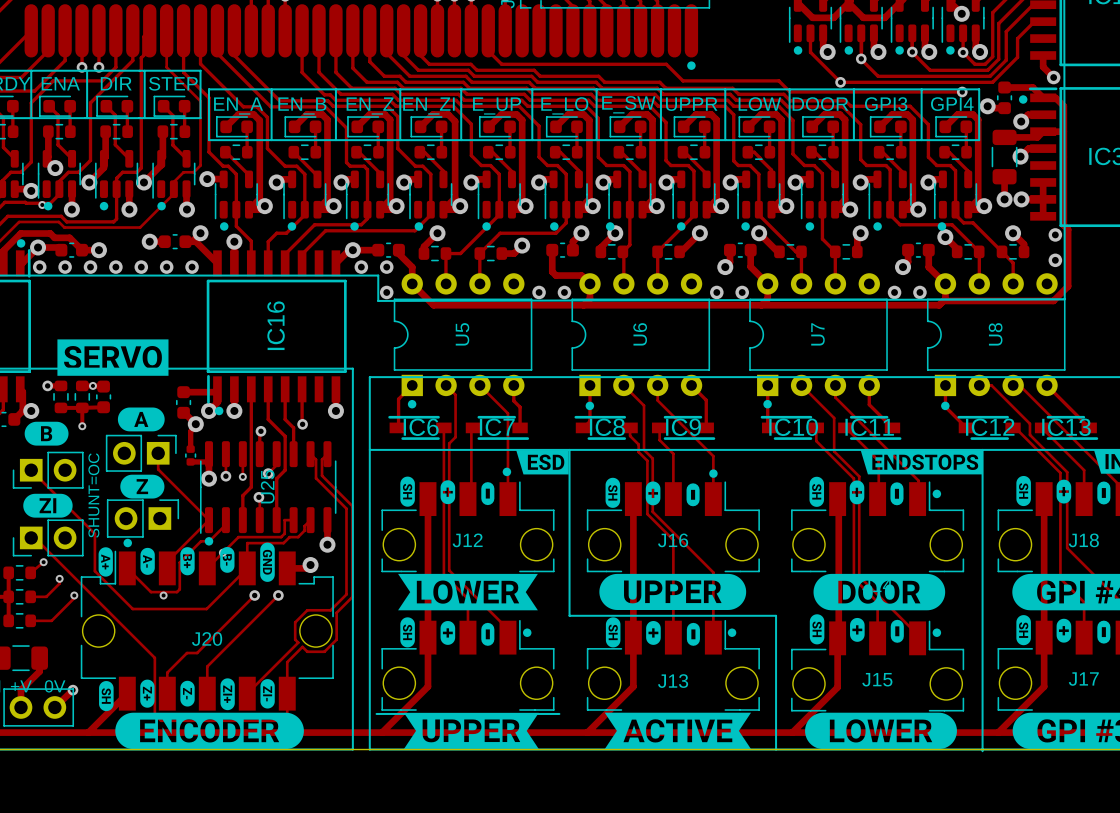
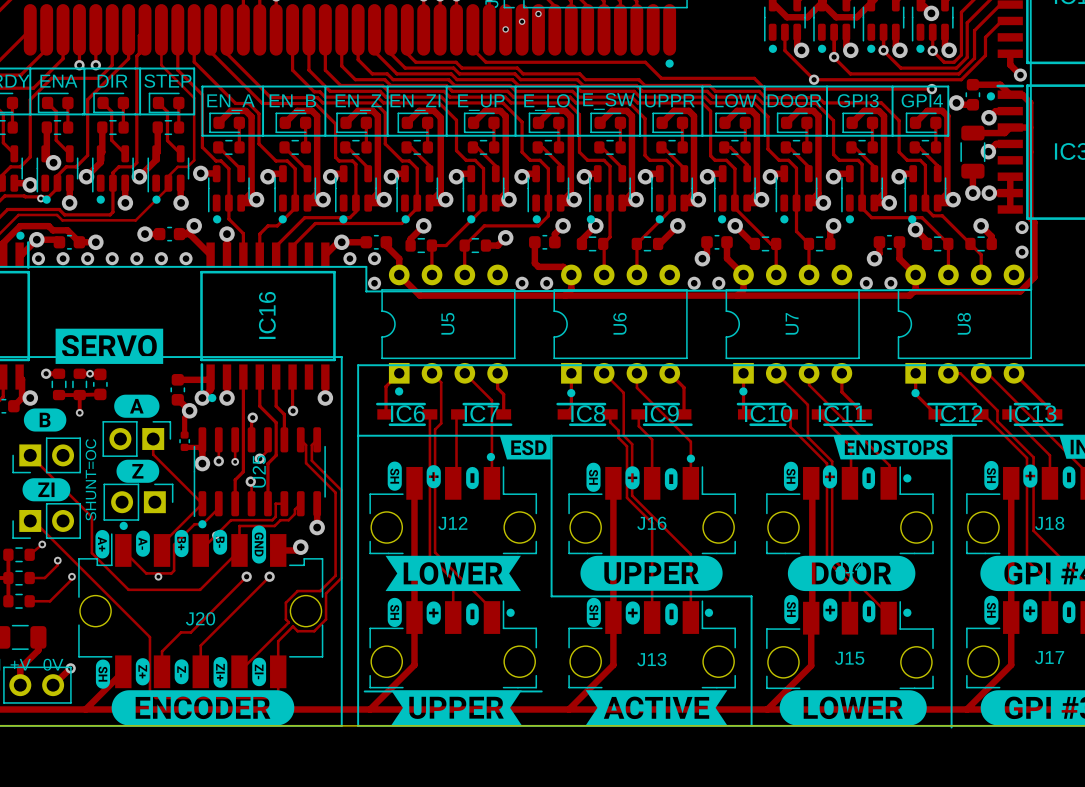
via: none -> (538, 13)
via: none -> (522, 21)
via: none -> (505, 29)

